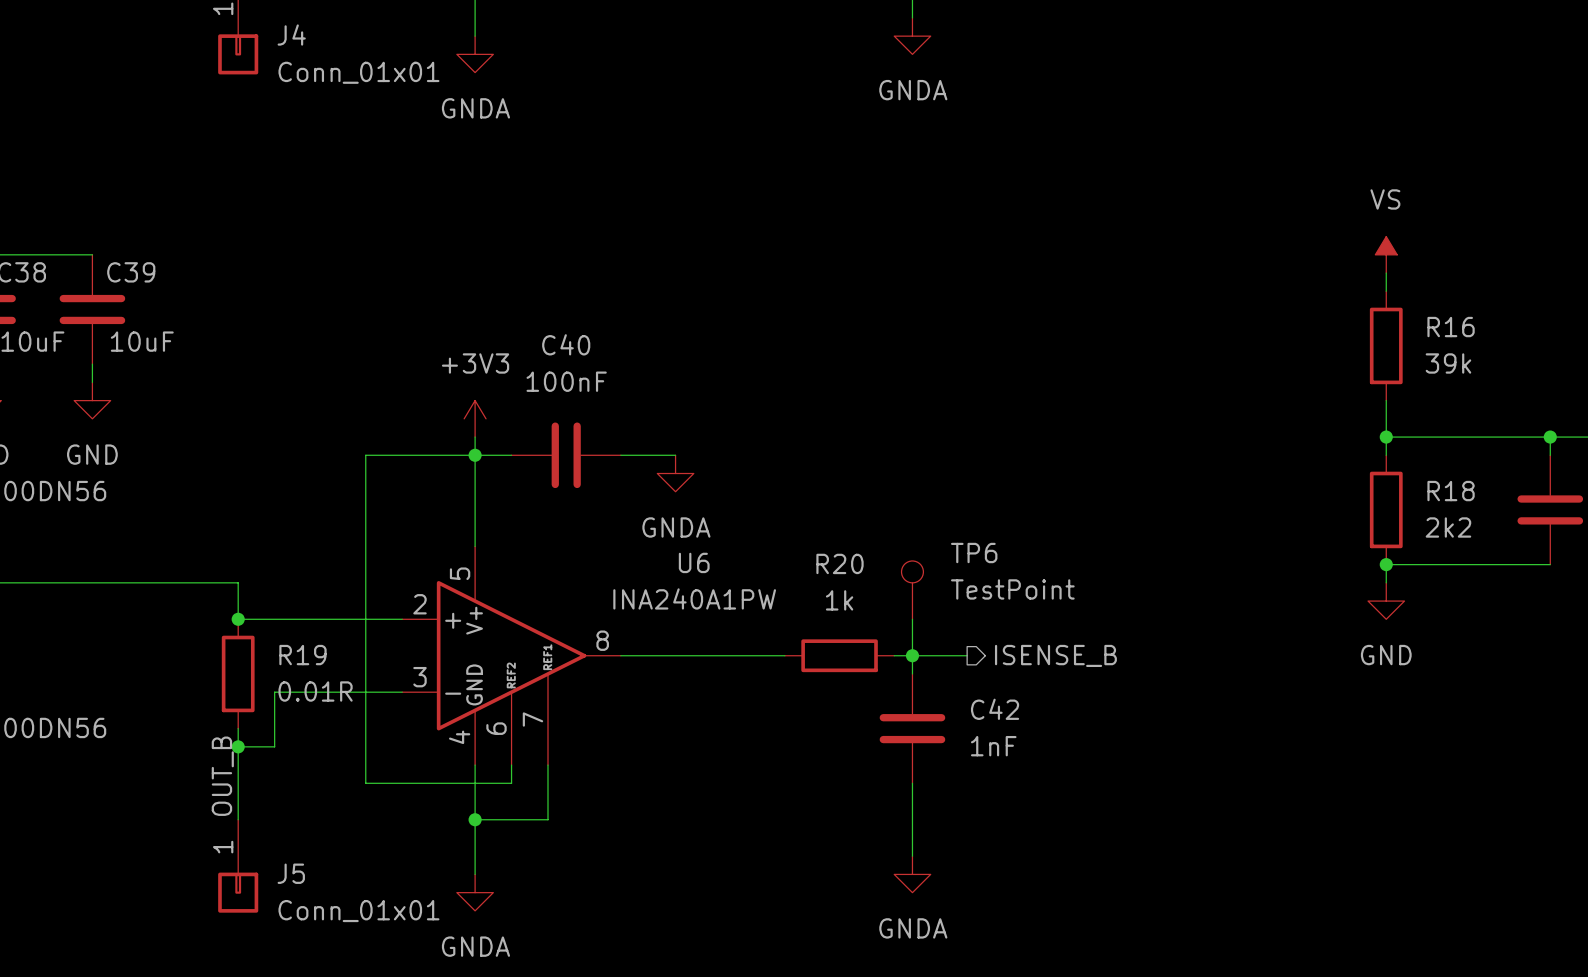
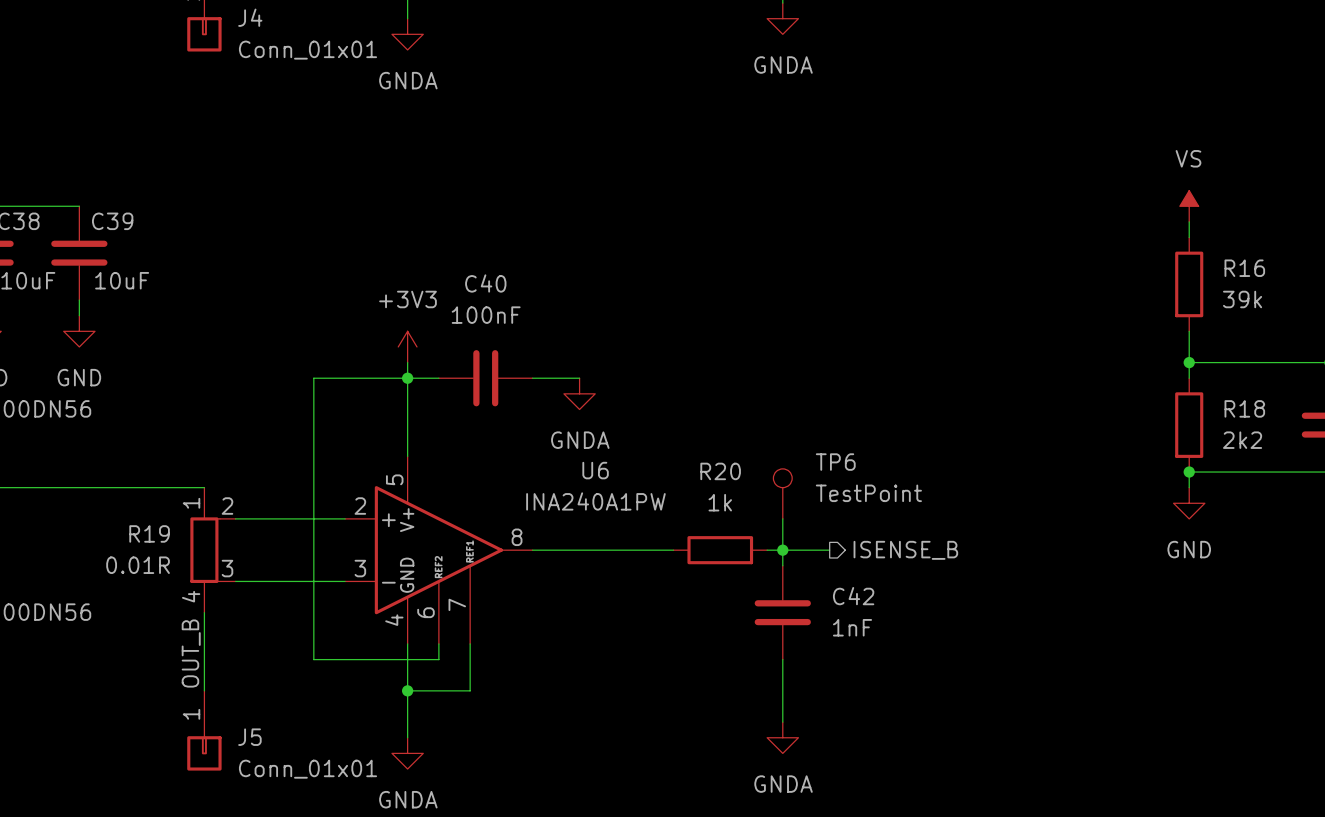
R19 symbol: [221, 619, 255, 729] -> [190, 487, 236, 613]
junction: (238, 619) -> none
R19 name position: R19 (302, 655) -> R19 (149, 533)
R19 value position: 0.01R (315, 691) -> 0.01R (138, 565)
wire: (274, 692) (274, 746) (238, 746) -> none
junction: (238, 746) -> none

